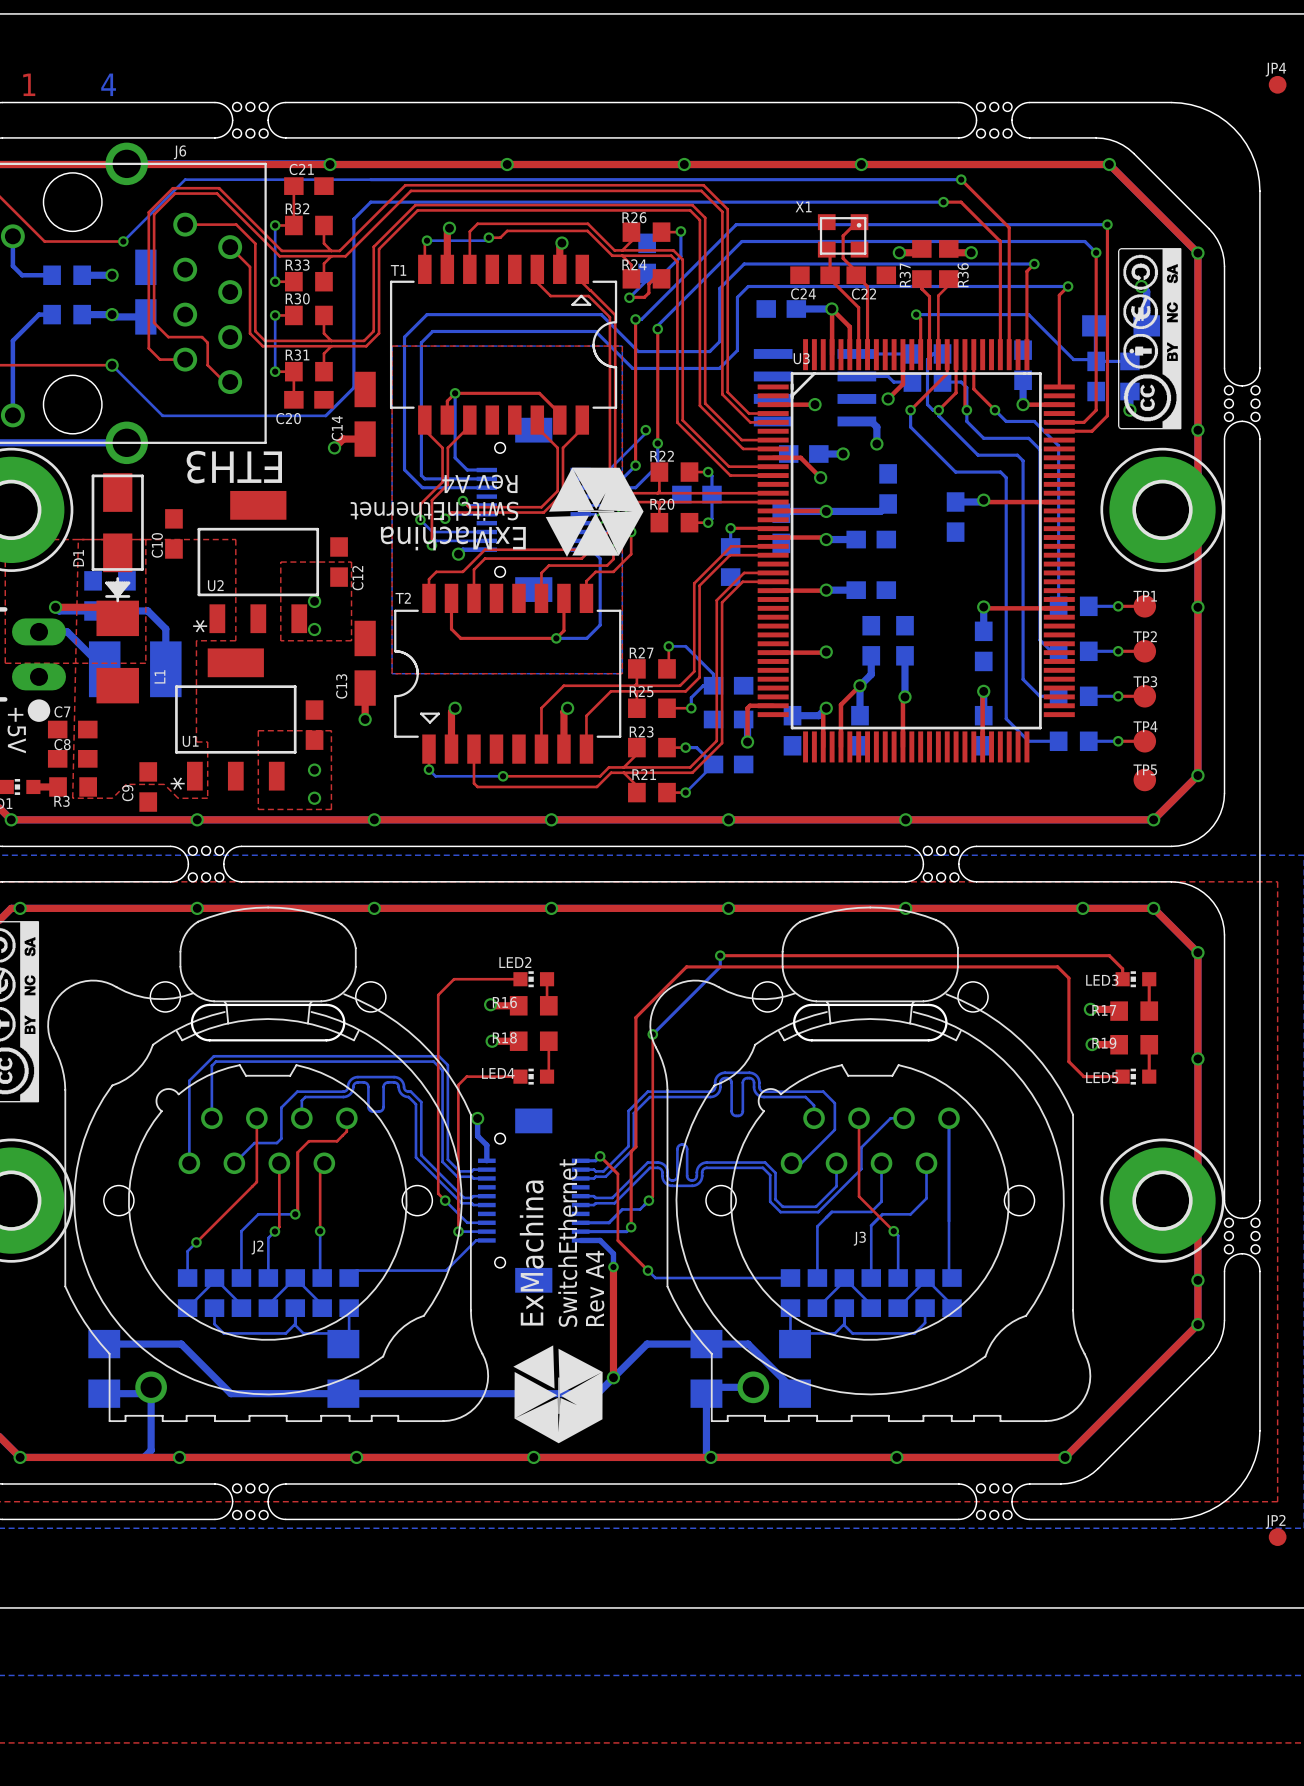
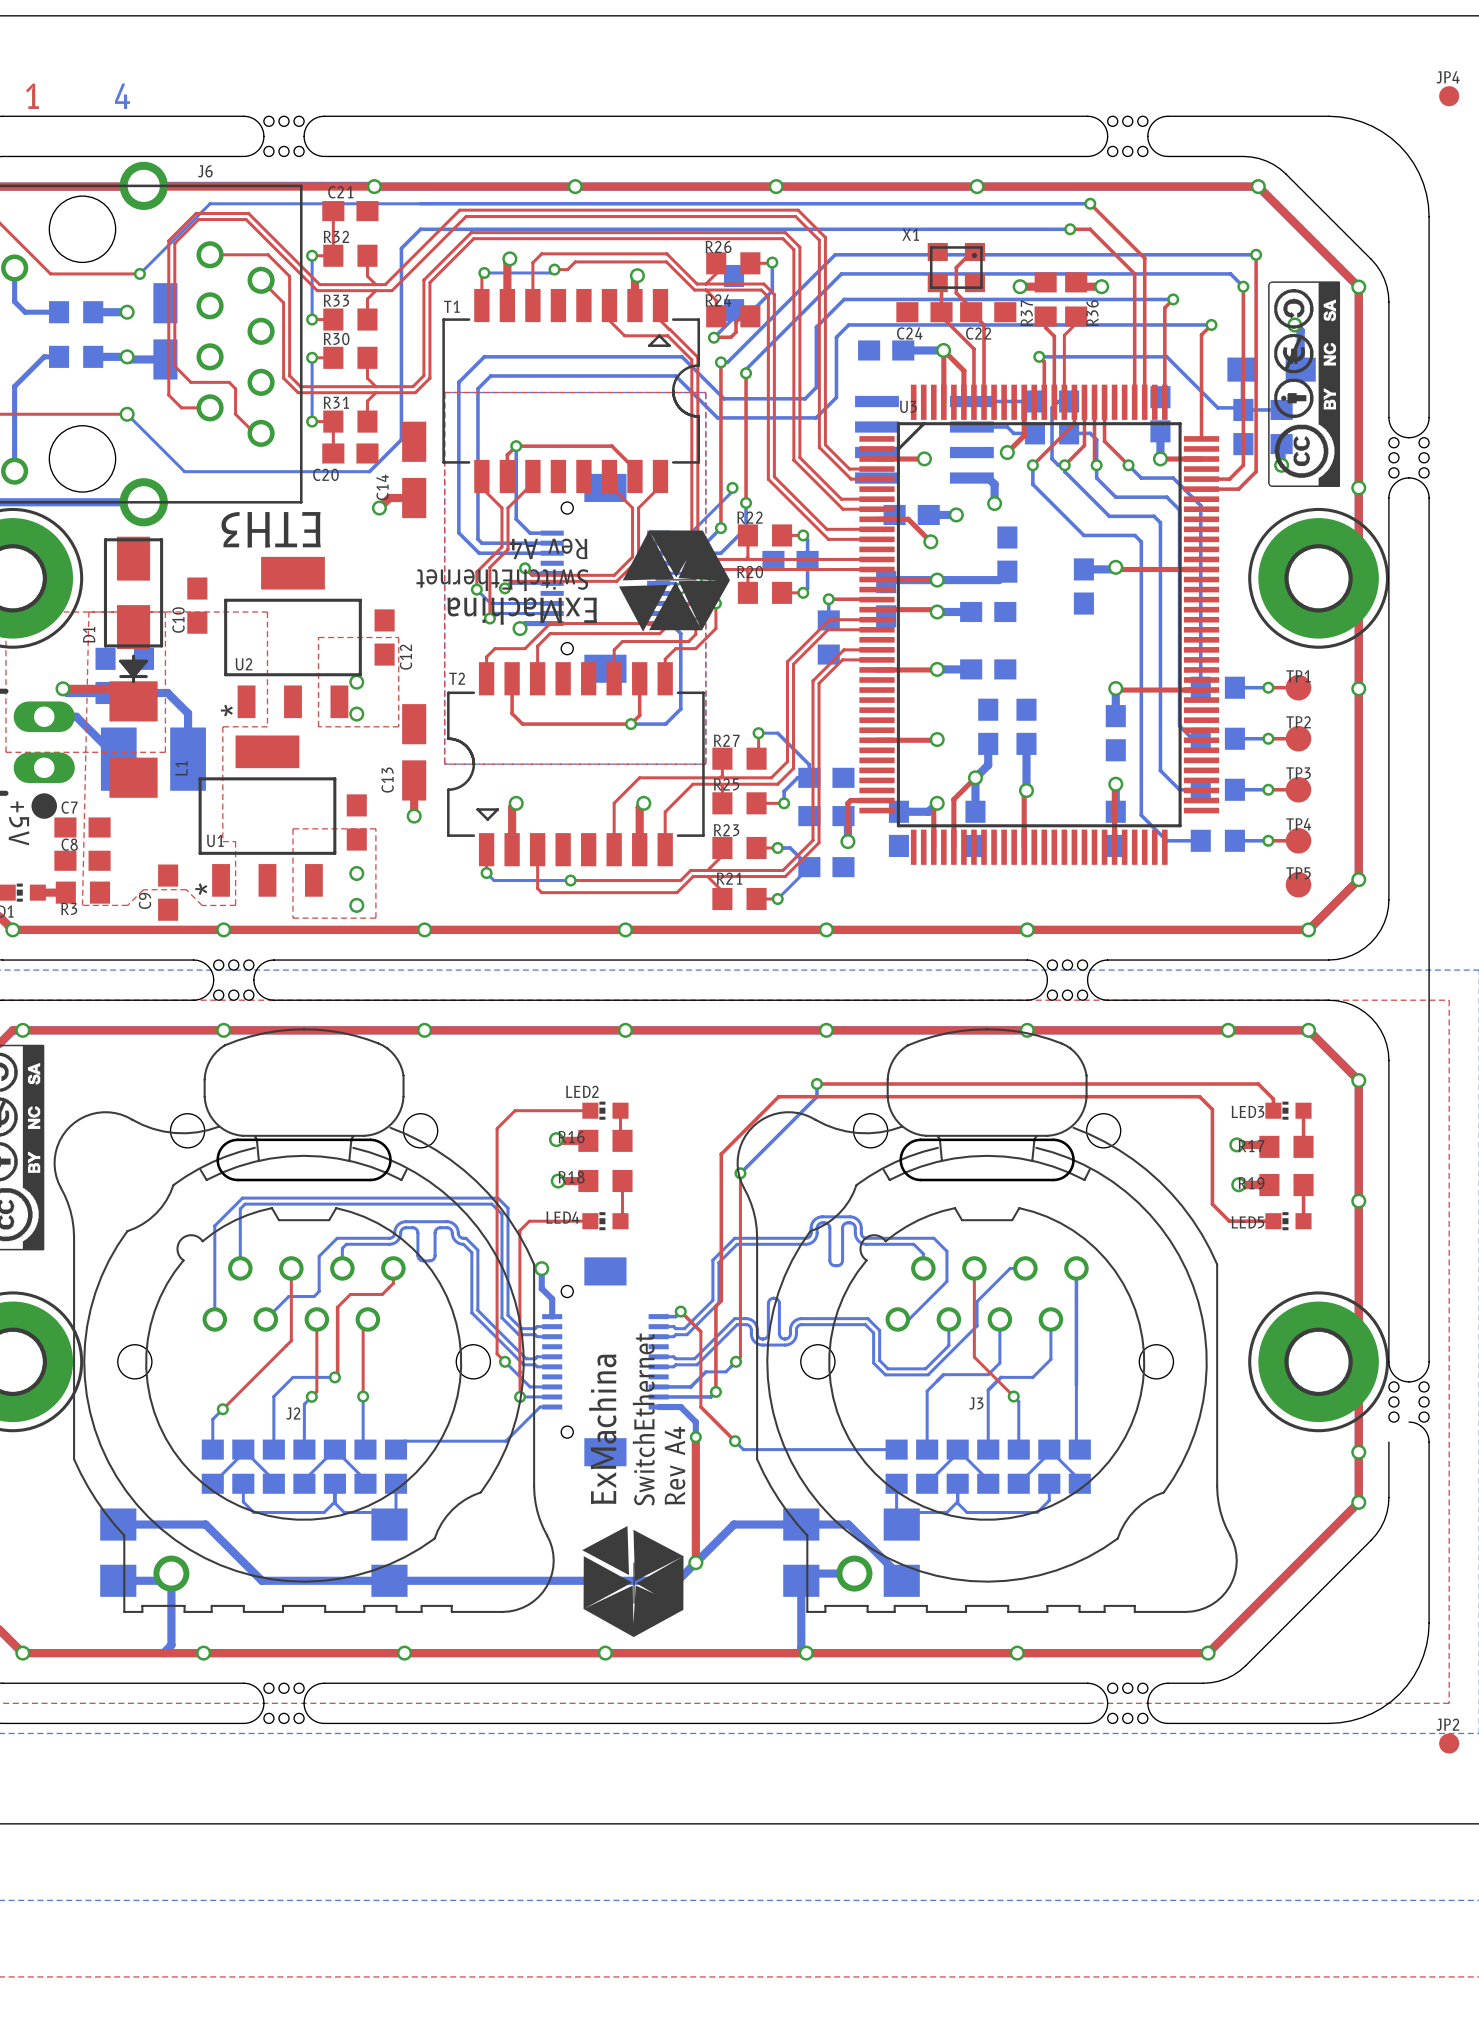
board edge: (1242, 1253) (1229, 1258) (1224, 1271) -> none

